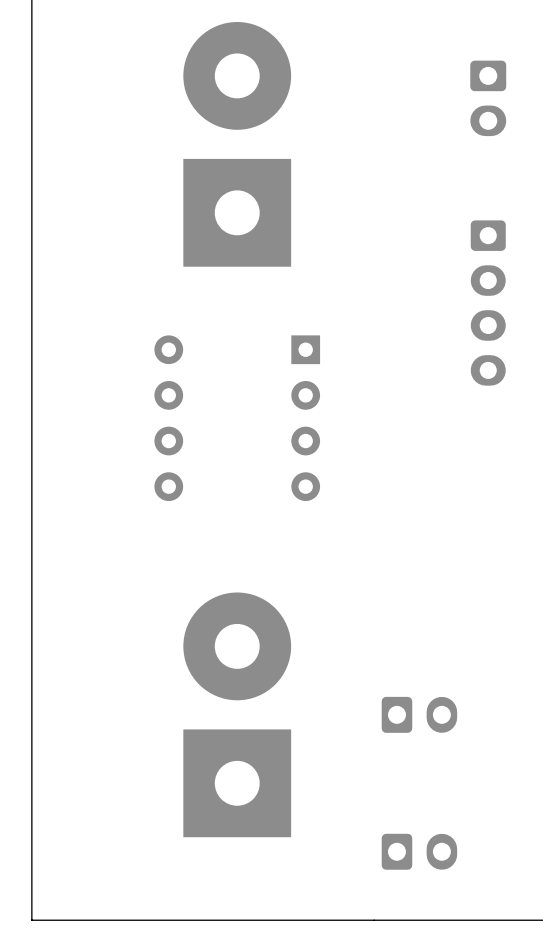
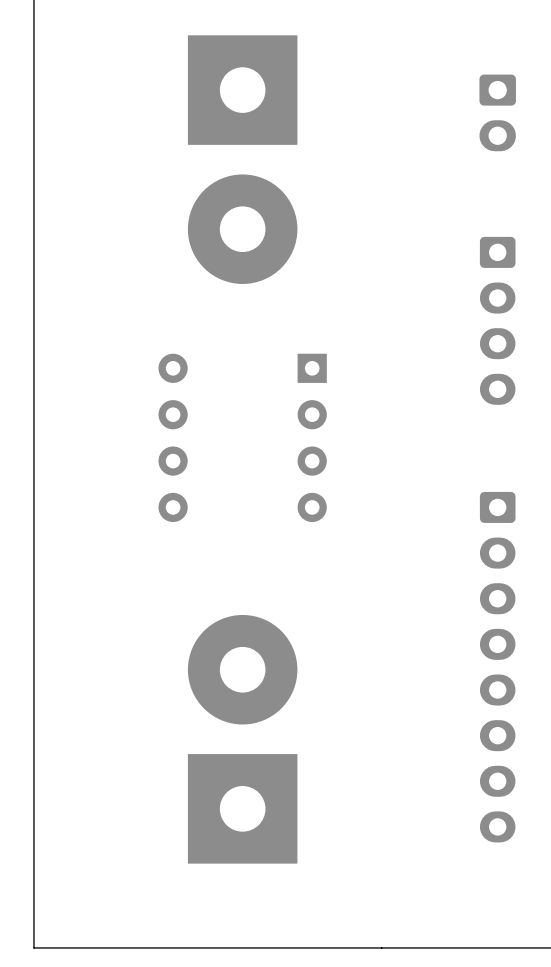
part rotation: 0° (237, 144) -> 180° (242, 159)
part: none -> (497, 667)
part: (419, 714) -> none
part: (419, 851) -> none

